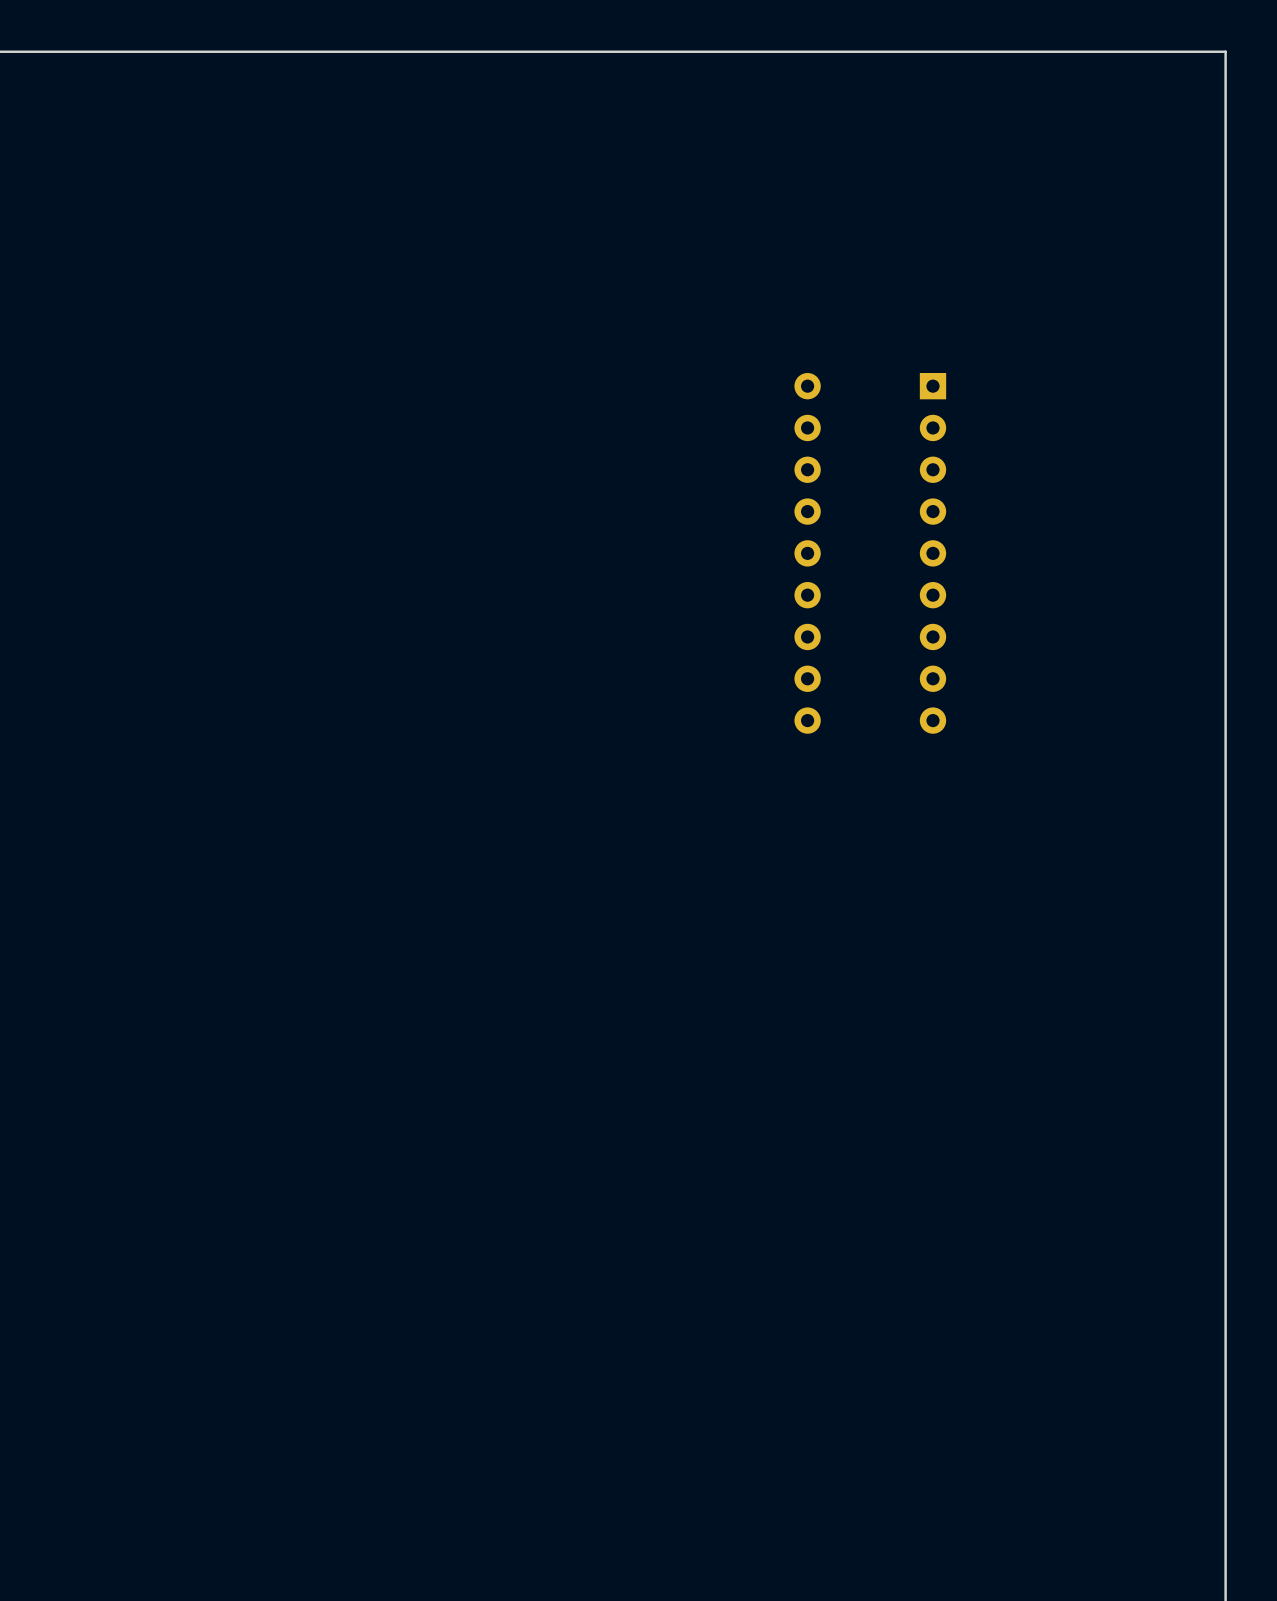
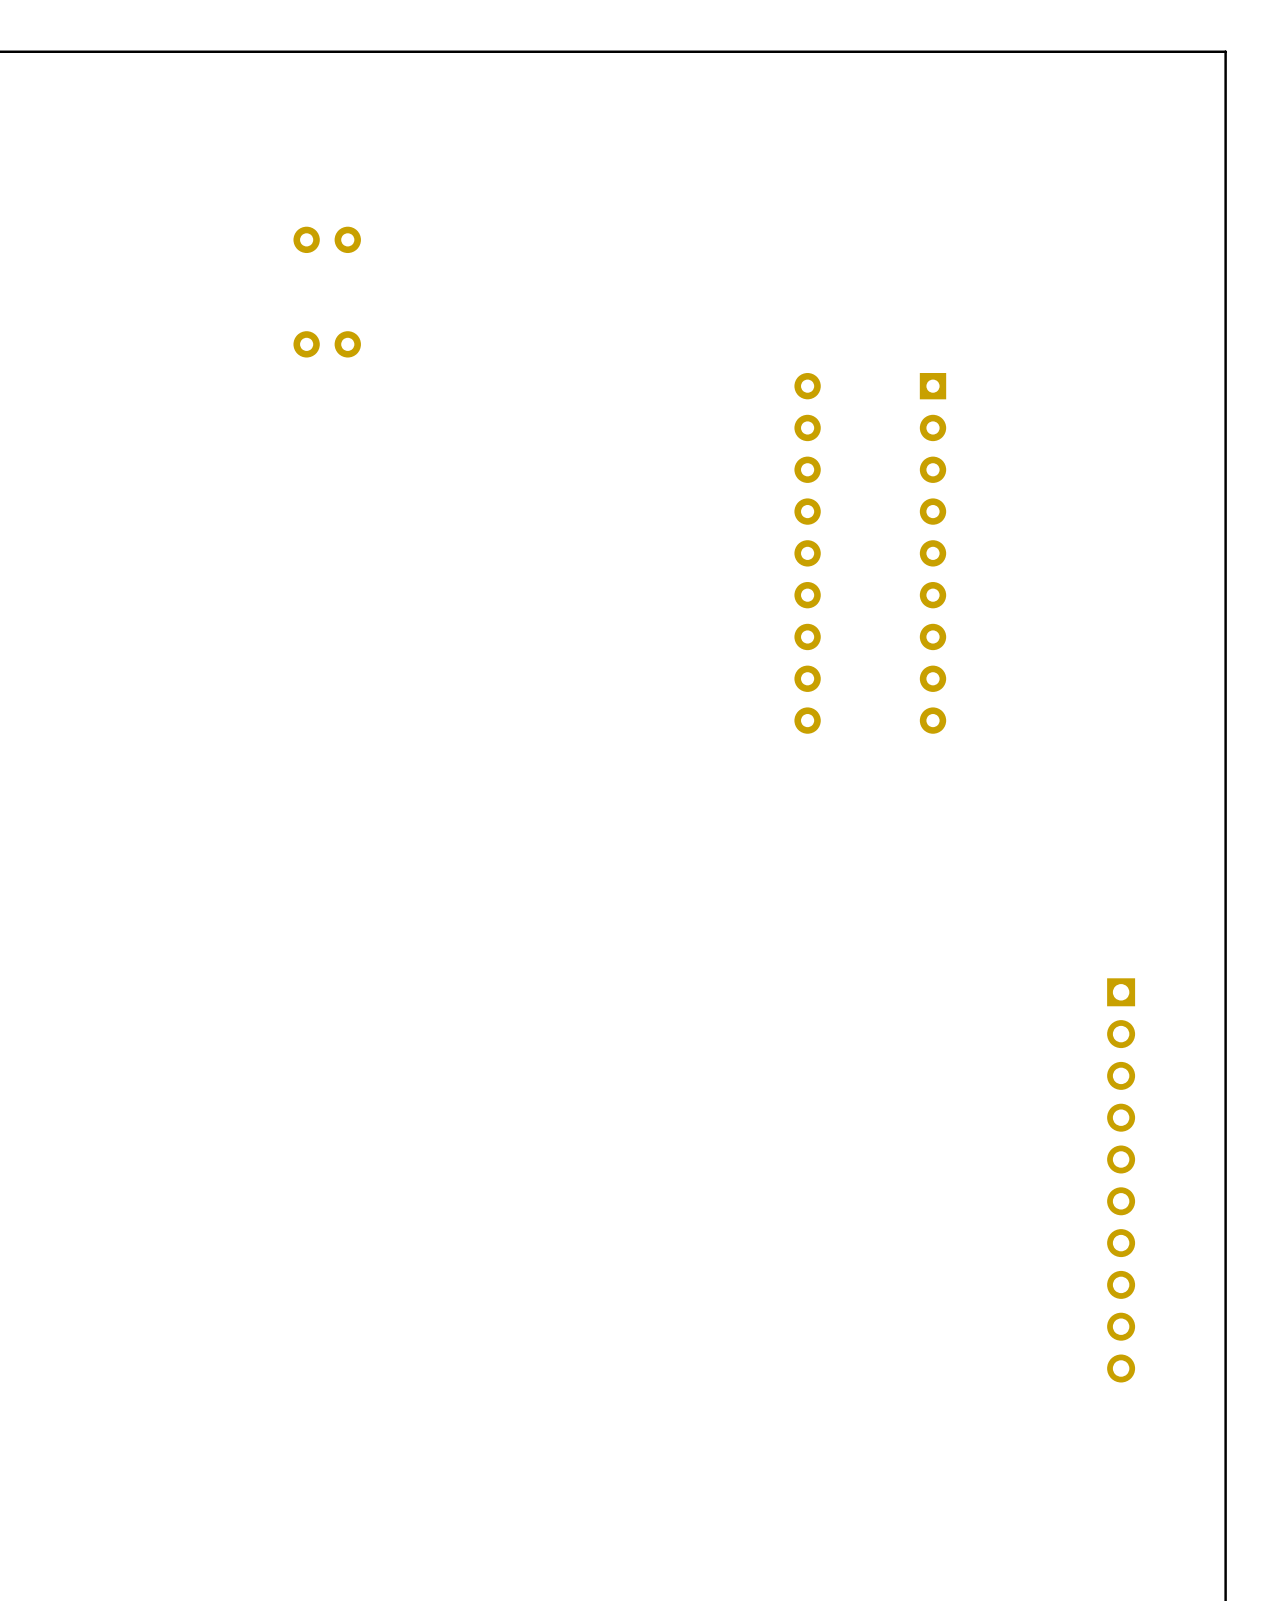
part: none -> (327, 239)
part: none -> (327, 344)
part: none -> (1121, 1180)

